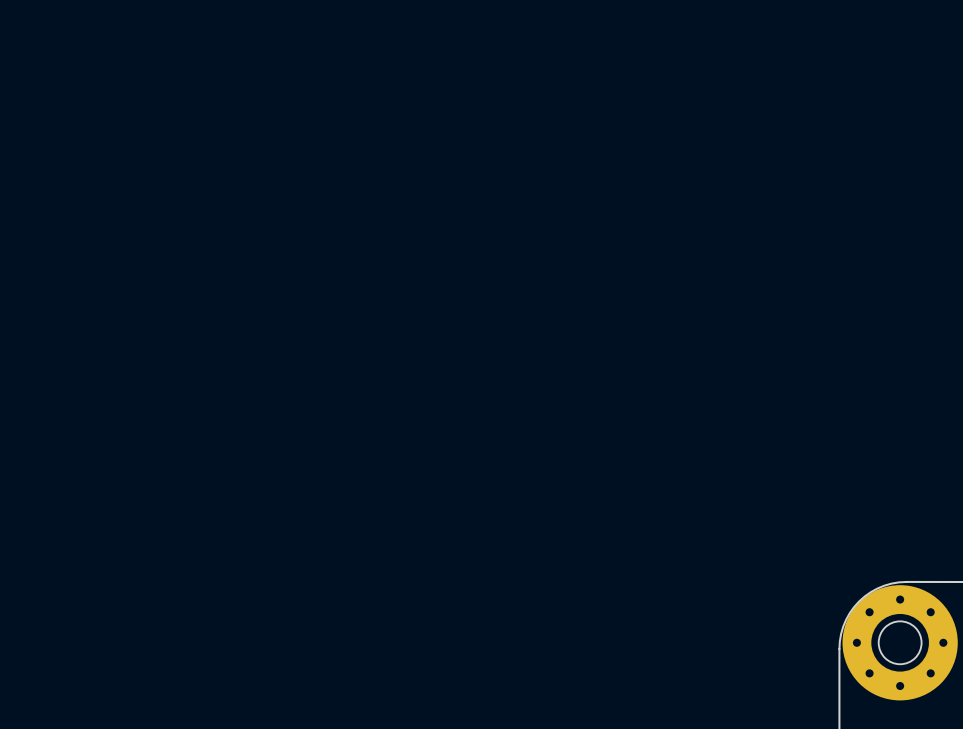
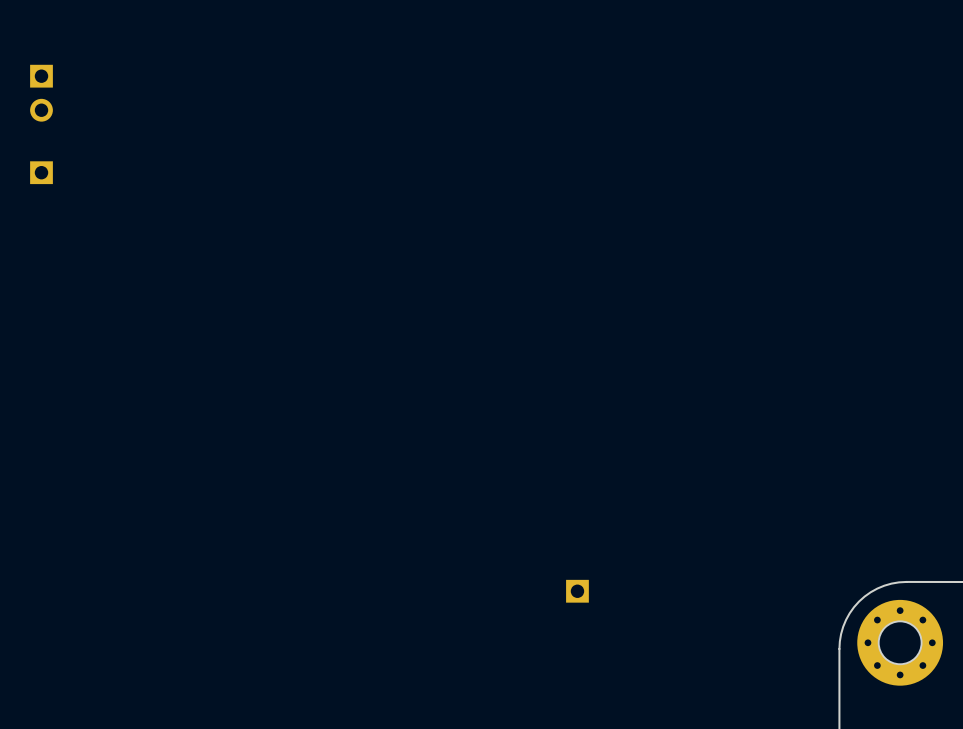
part: none -> (41, 93)
part: none -> (41, 172)
part footprint: [842, 585, 958, 701] -> [857, 599, 944, 686]
part: none -> (577, 591)

